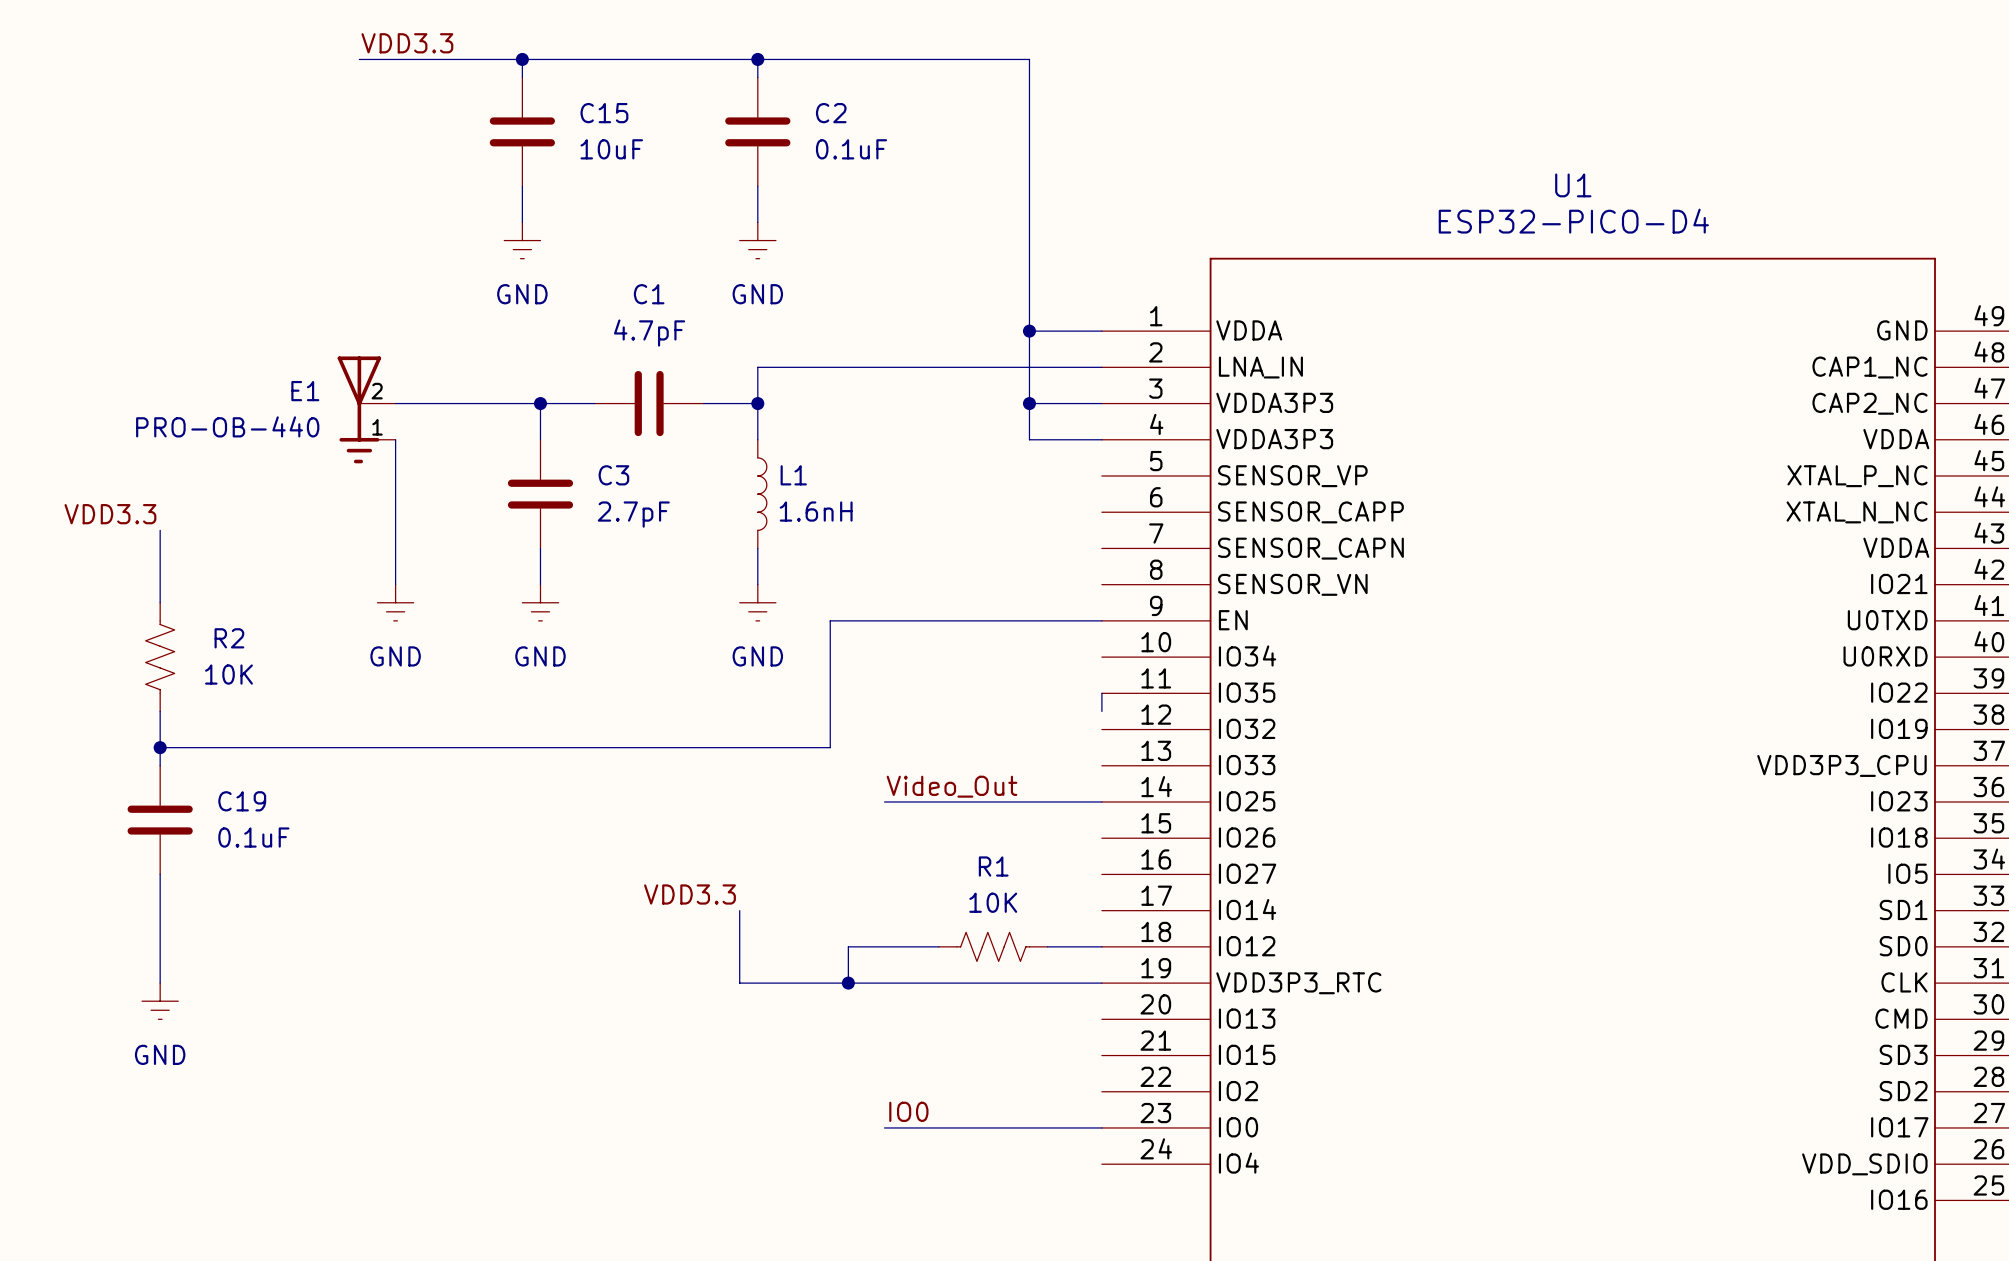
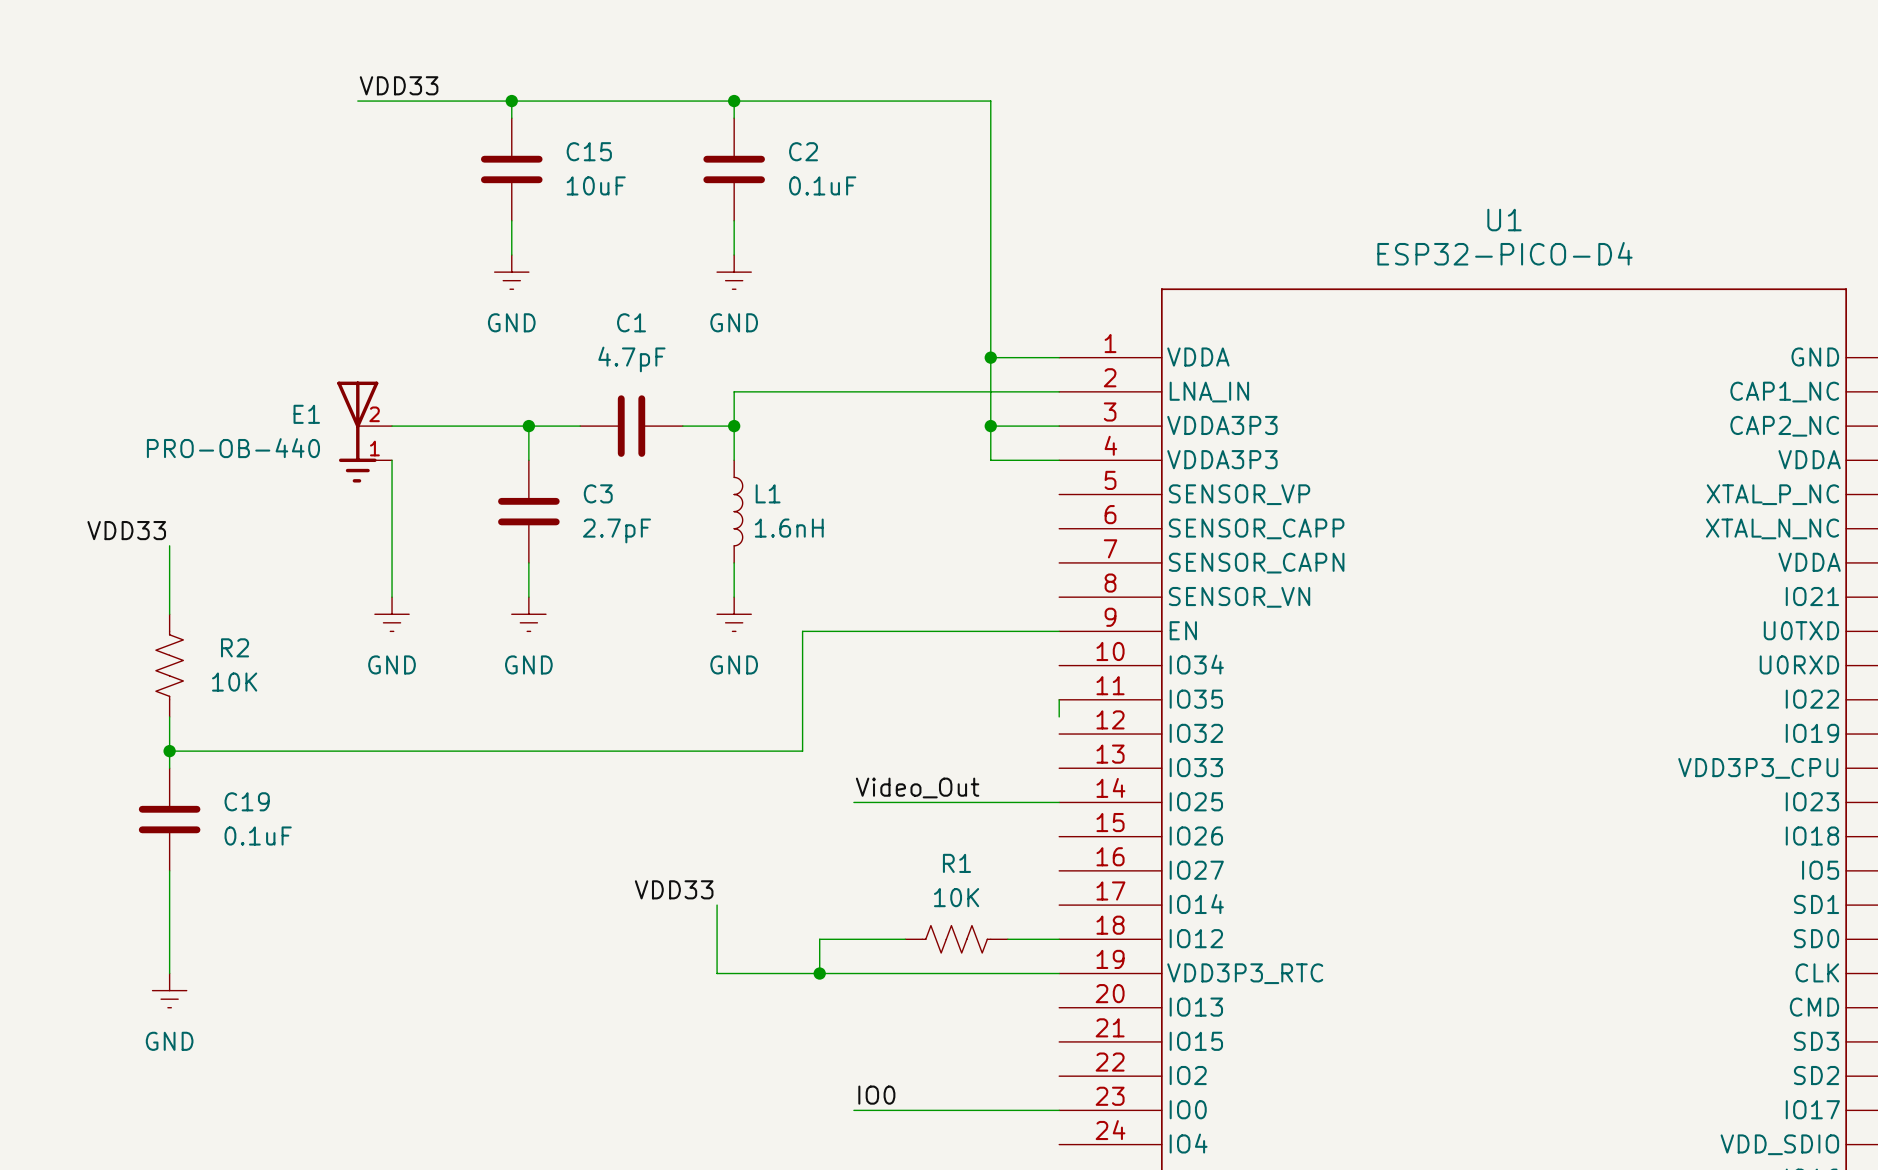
label: VDD3.3 (407, 43) -> VDD33 (399, 85)
label: VDD3.3 (110, 514) -> VDD33 (126, 530)
label: VDD3.3 (689, 894) -> VDD33 (674, 889)

